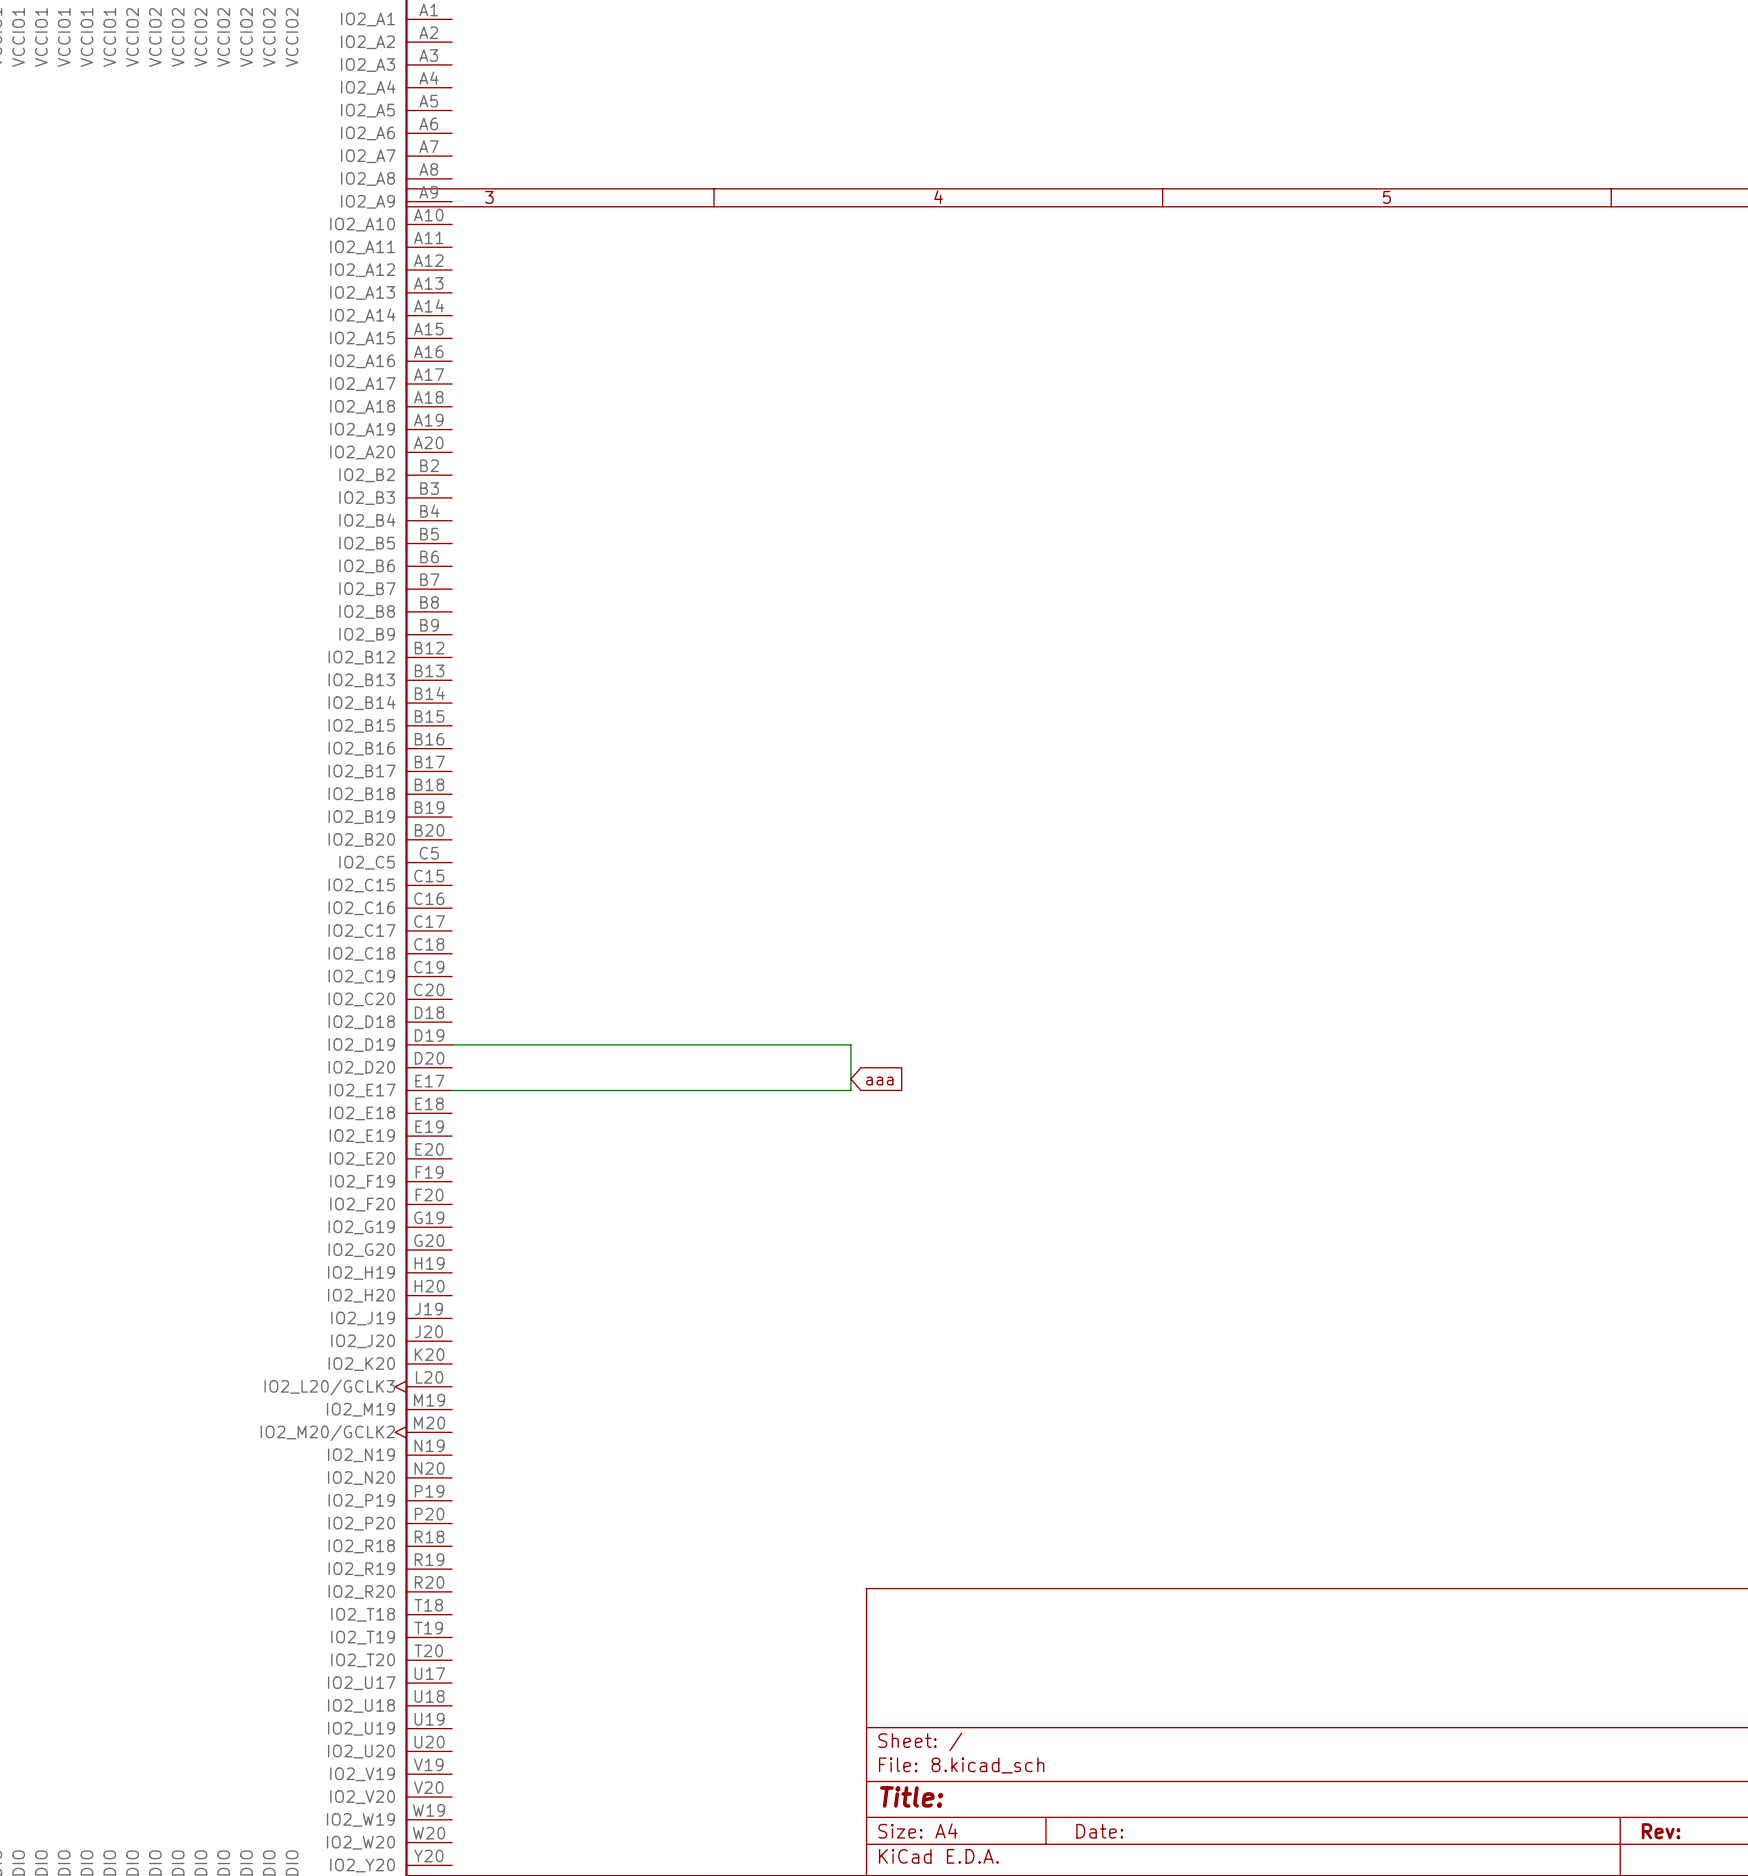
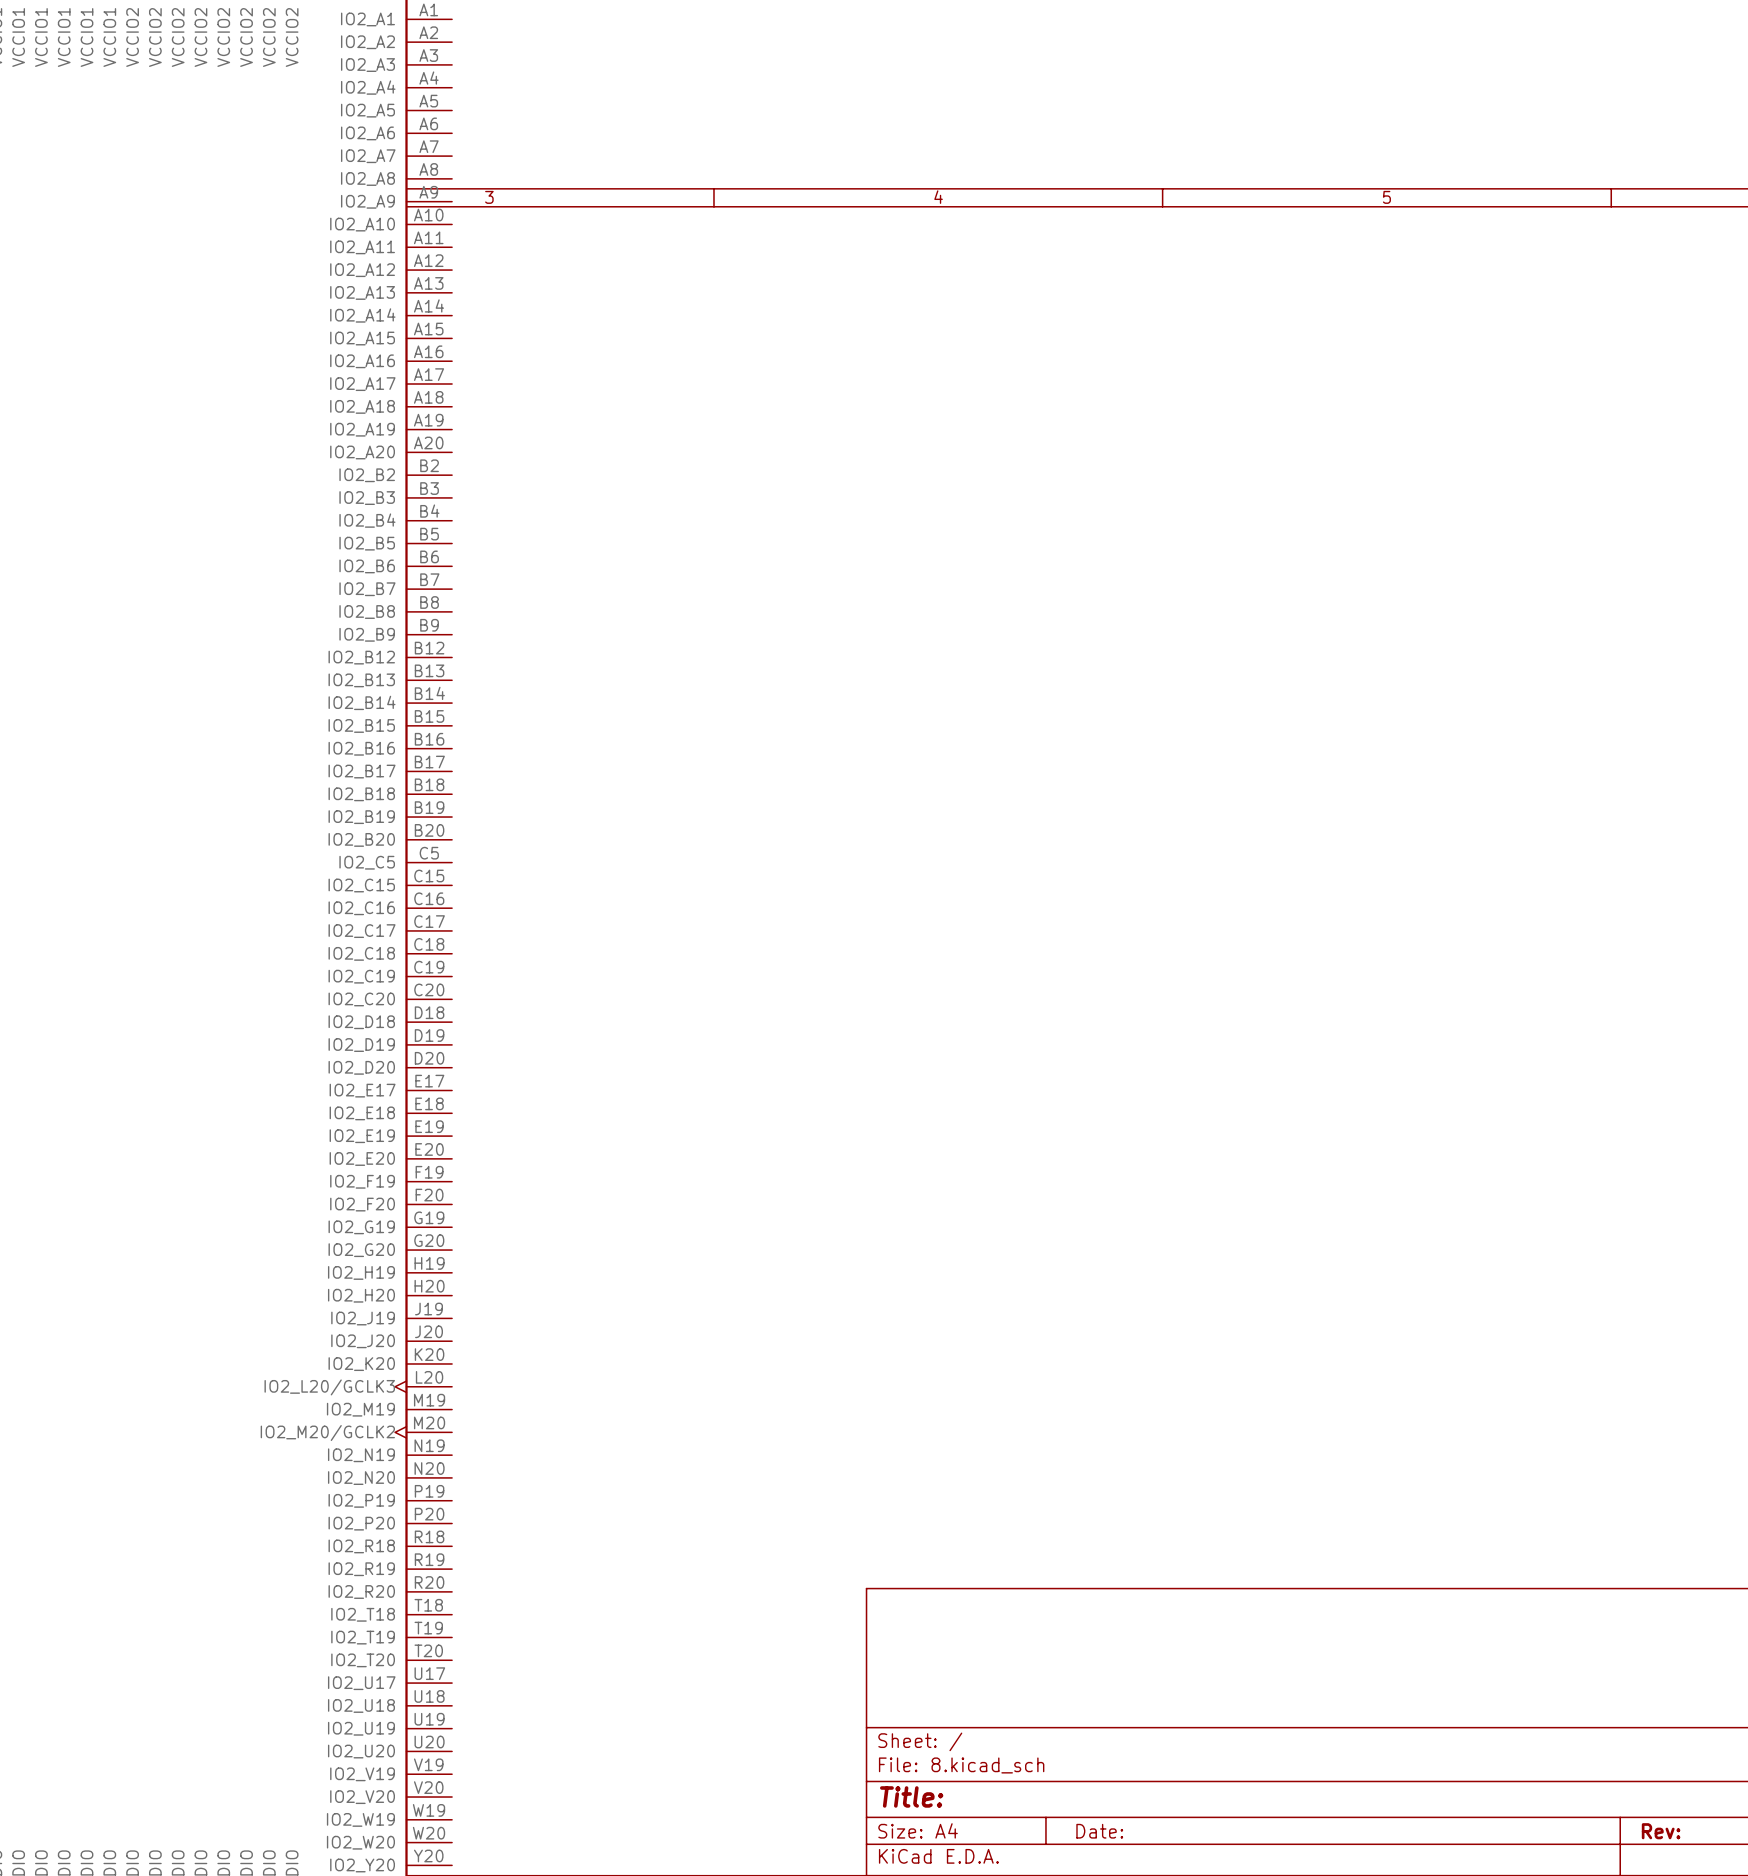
wire: (452, 1044) (850, 1044) (850, 1090) (452, 1090) -> none
global label: aaa (879, 1081) -> none

